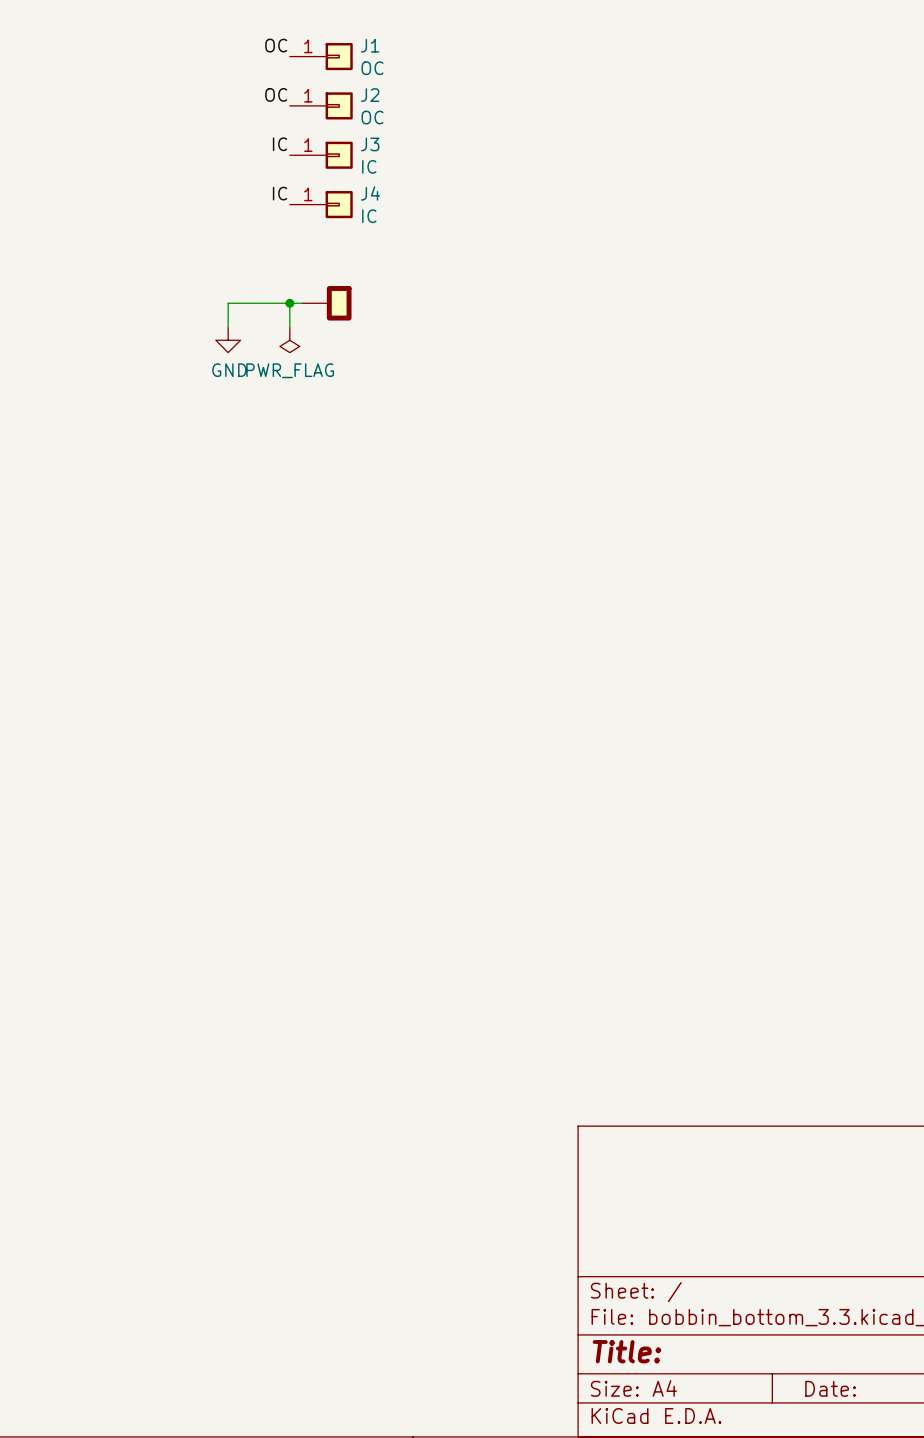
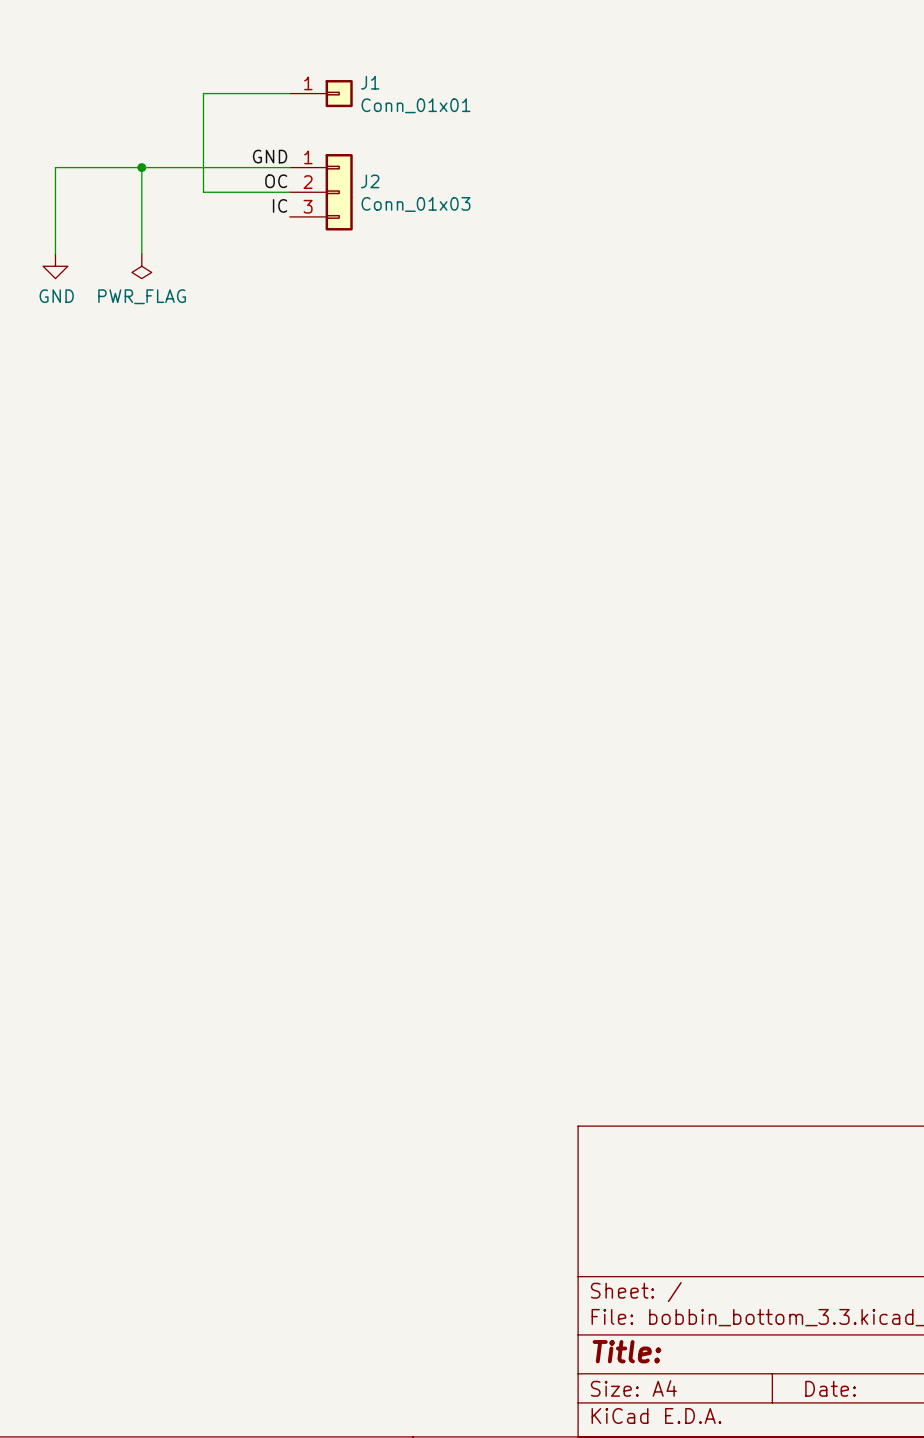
label: OC (276, 45) -> none
J1 position: (321, 56) -> (321, 93)
J1 value: OC (372, 68) -> Conn_01x01 (415, 105)
J2 symbol: [289, 92, 353, 120] -> [289, 154, 353, 231]
wire: none -> (289, 93) (203, 93) (203, 192) (289, 192)
label: OC (276, 94) -> none
J2 value: OC (372, 117) -> Conn_01x03 (415, 204)
label: IC (280, 144) -> none
J3: IC (321, 155) -> none
label: none -> GND (270, 156)
wire: none -> (141, 167) (141, 253)
junction: none -> (141, 167)
wire: none -> (289, 167) (55, 167) (55, 253)
label: none -> OC (276, 181)
label position: IC (280, 193) -> IC (280, 205)
J4: IC (321, 204) -> none
wire: (289, 303) (289, 327) -> none
junction: (289, 303) -> none
wire: (302, 303) (228, 303) (228, 327) -> none
part: (326, 303) -> none
power symbol position: GND (228, 340) -> GND (55, 266)
power symbol position: PWR_FLAG (289, 340) -> PWR_FLAG (141, 266)

